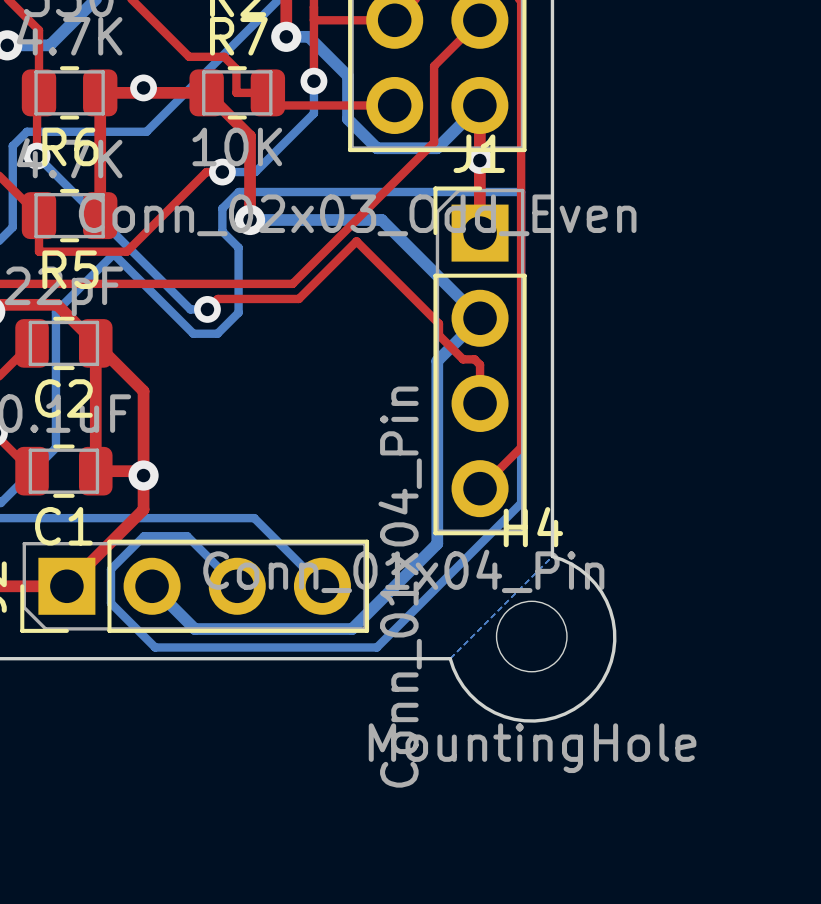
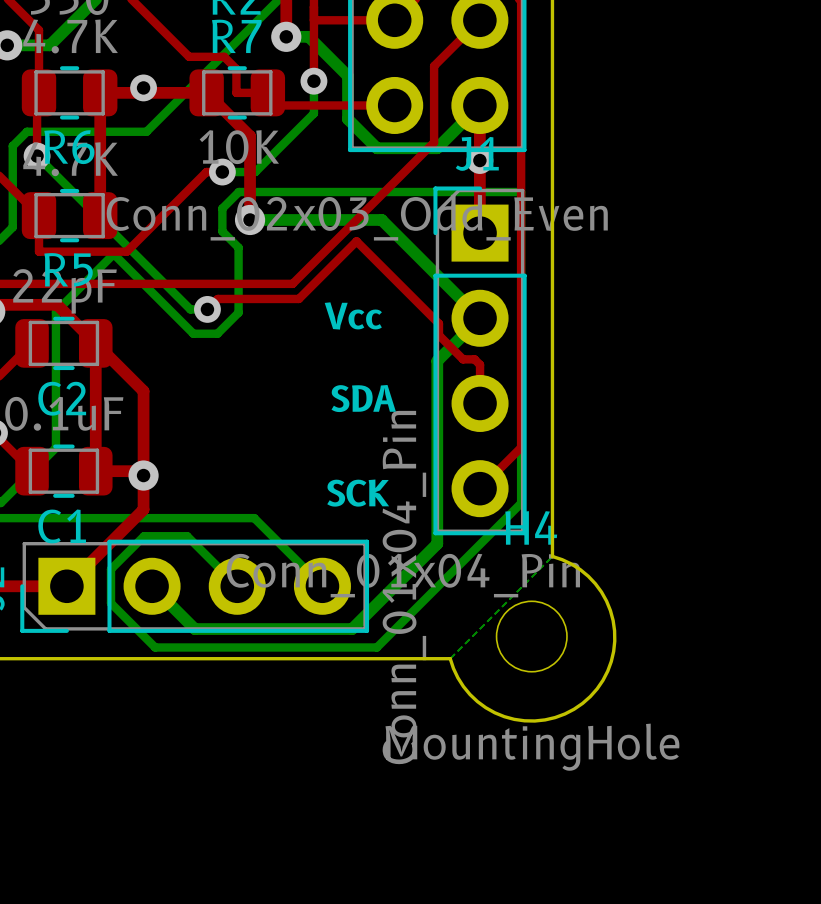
text: none -> Vcc (353, 315)
text: none -> SDA (363, 398)
text: none -> SCK (358, 493)

